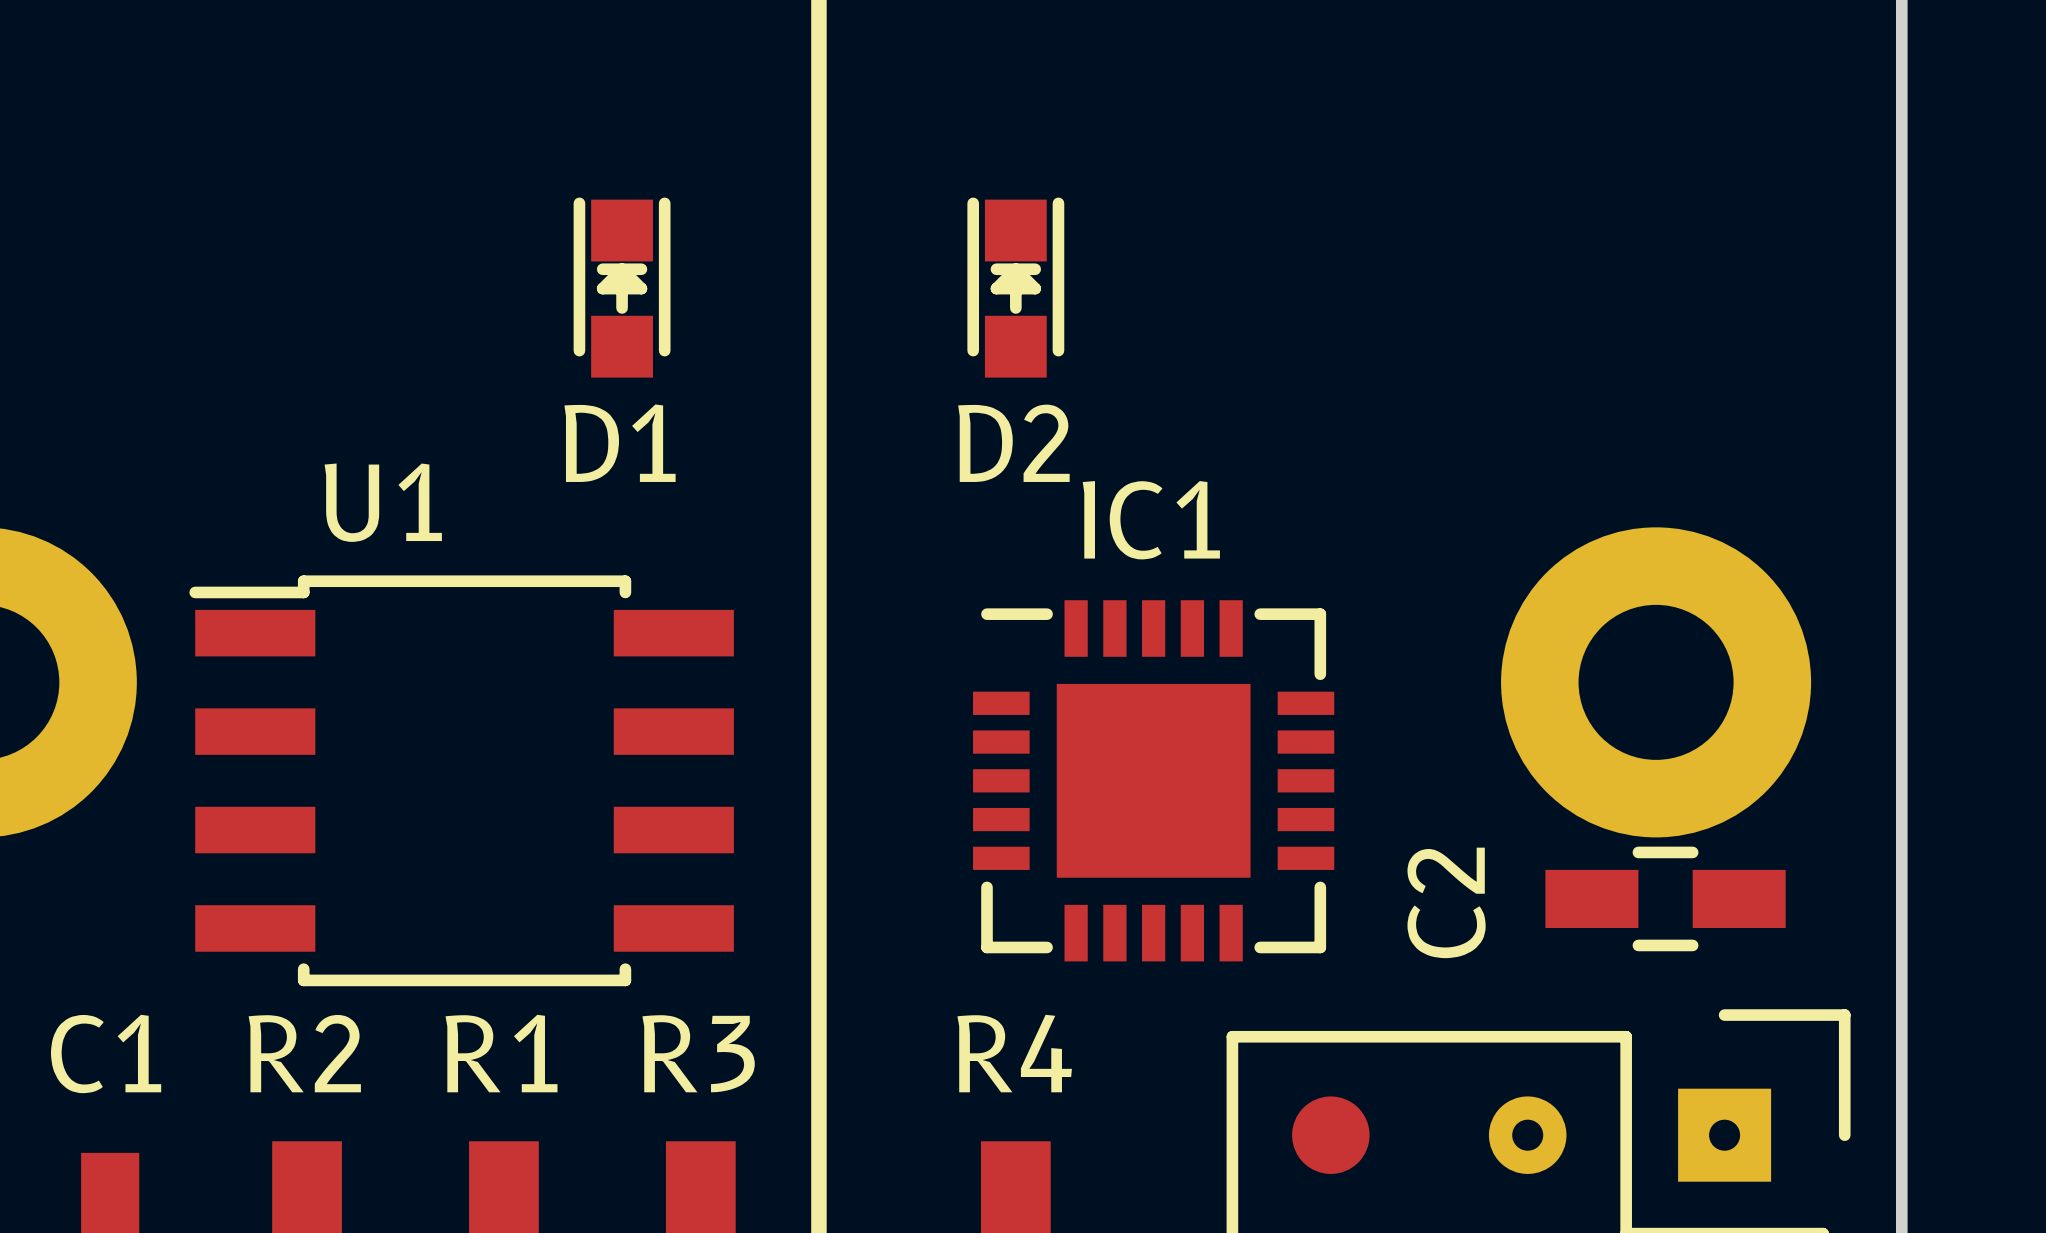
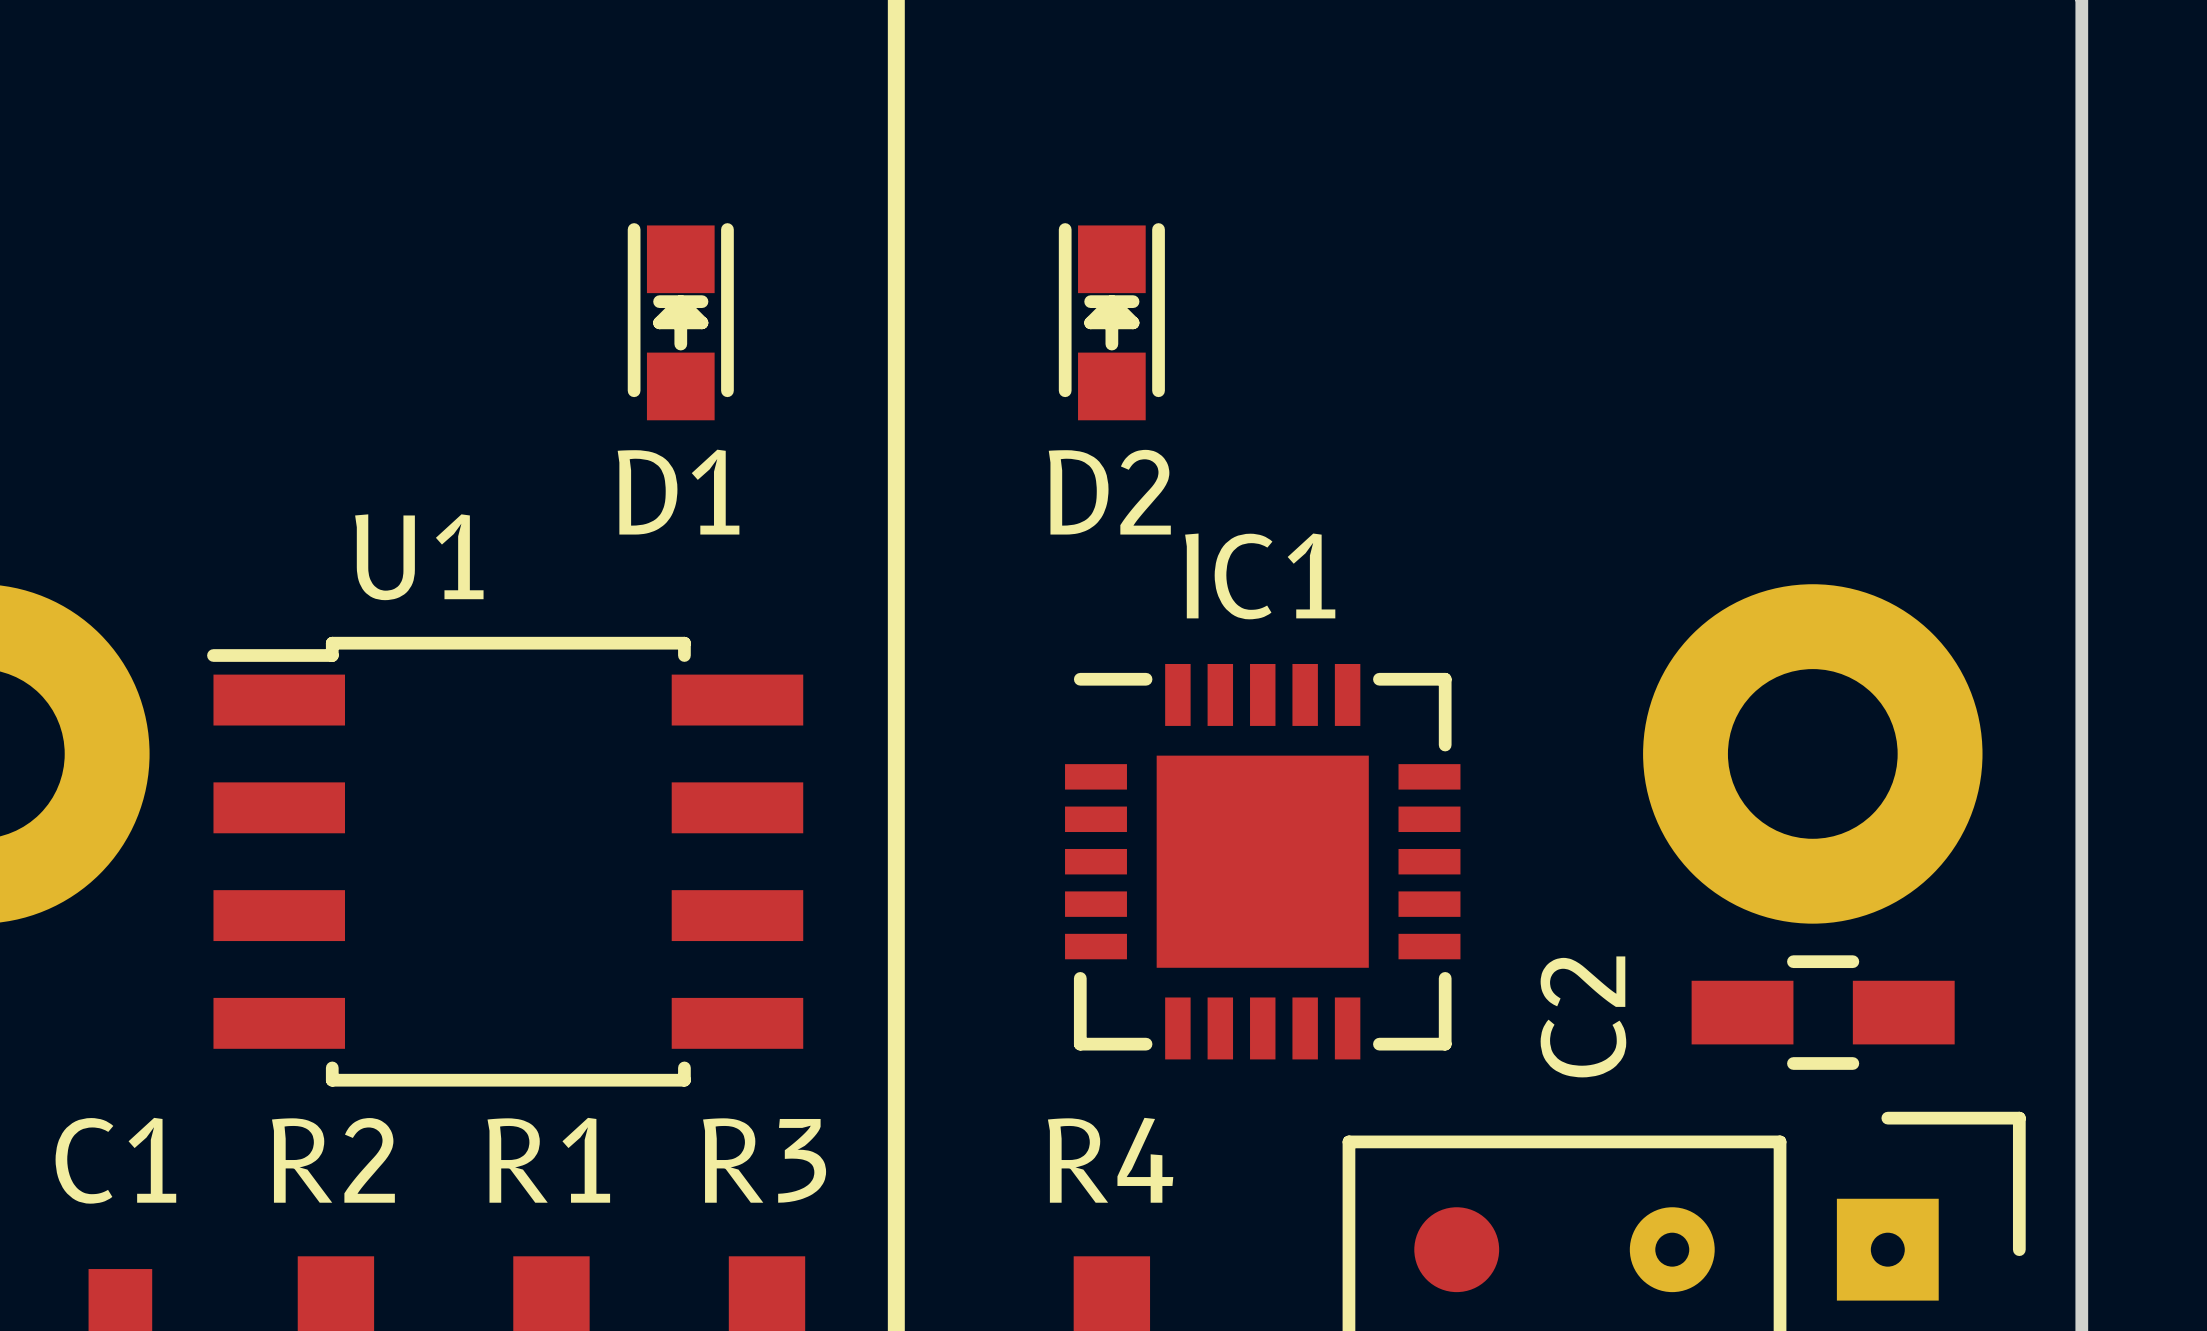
C2 position: (1665, 898) -> (1823, 1012)

